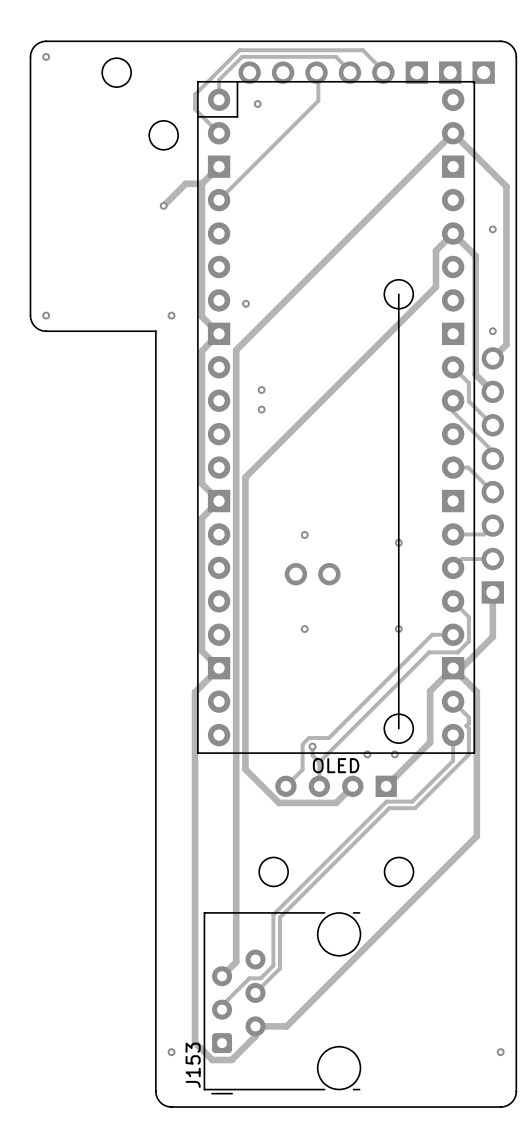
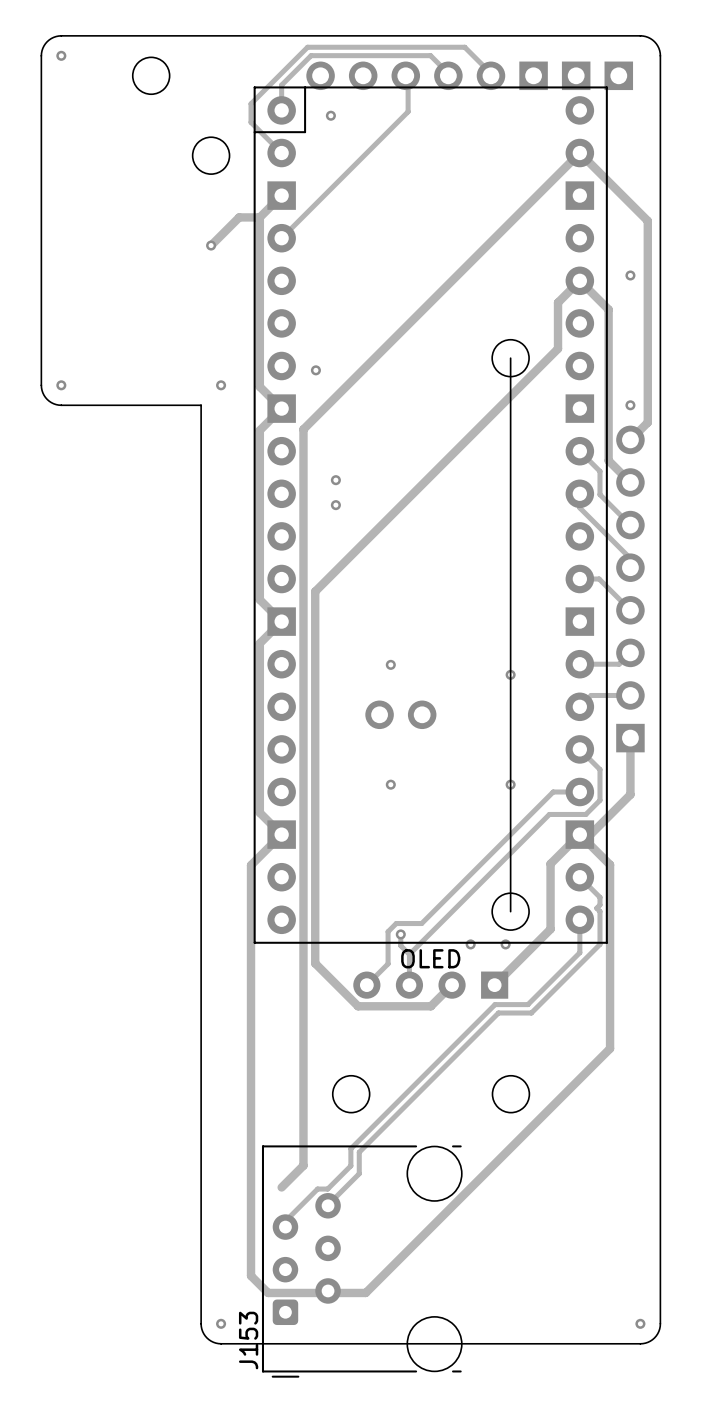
track: (236, 928) (236, 962) (222, 976) -> (303, 1165) (281, 1187)
track: (273, 928) (273, 965) (260, 978) (249, 978) (222, 1005) (222, 1009) -> (350, 1165) (327, 1189) (317, 1189) (281, 1225) (281, 1230)
track: (280, 934) (280, 968) (255, 992) -> (359, 1173) (324, 1208)
track: (195, 1014) (195, 1042) (212, 1060) (231, 1060) (255, 1036) (255, 1026) (286, 1026) -> (251, 1275) (268, 1292) (365, 1292) (367, 1290)
board edge: (155, 1052) (156, 1095) (160, 1102) (169, 1106) (500, 1107) (511, 1102) (516, 1091) -> (201, 1323) (202, 1331) (206, 1337) (213, 1342) (221, 1343) (640, 1343) (648, 1342) (654, 1337) (658, 1331) (660, 1323)
board edge: (516, 1052) (516, 1091) -> none

